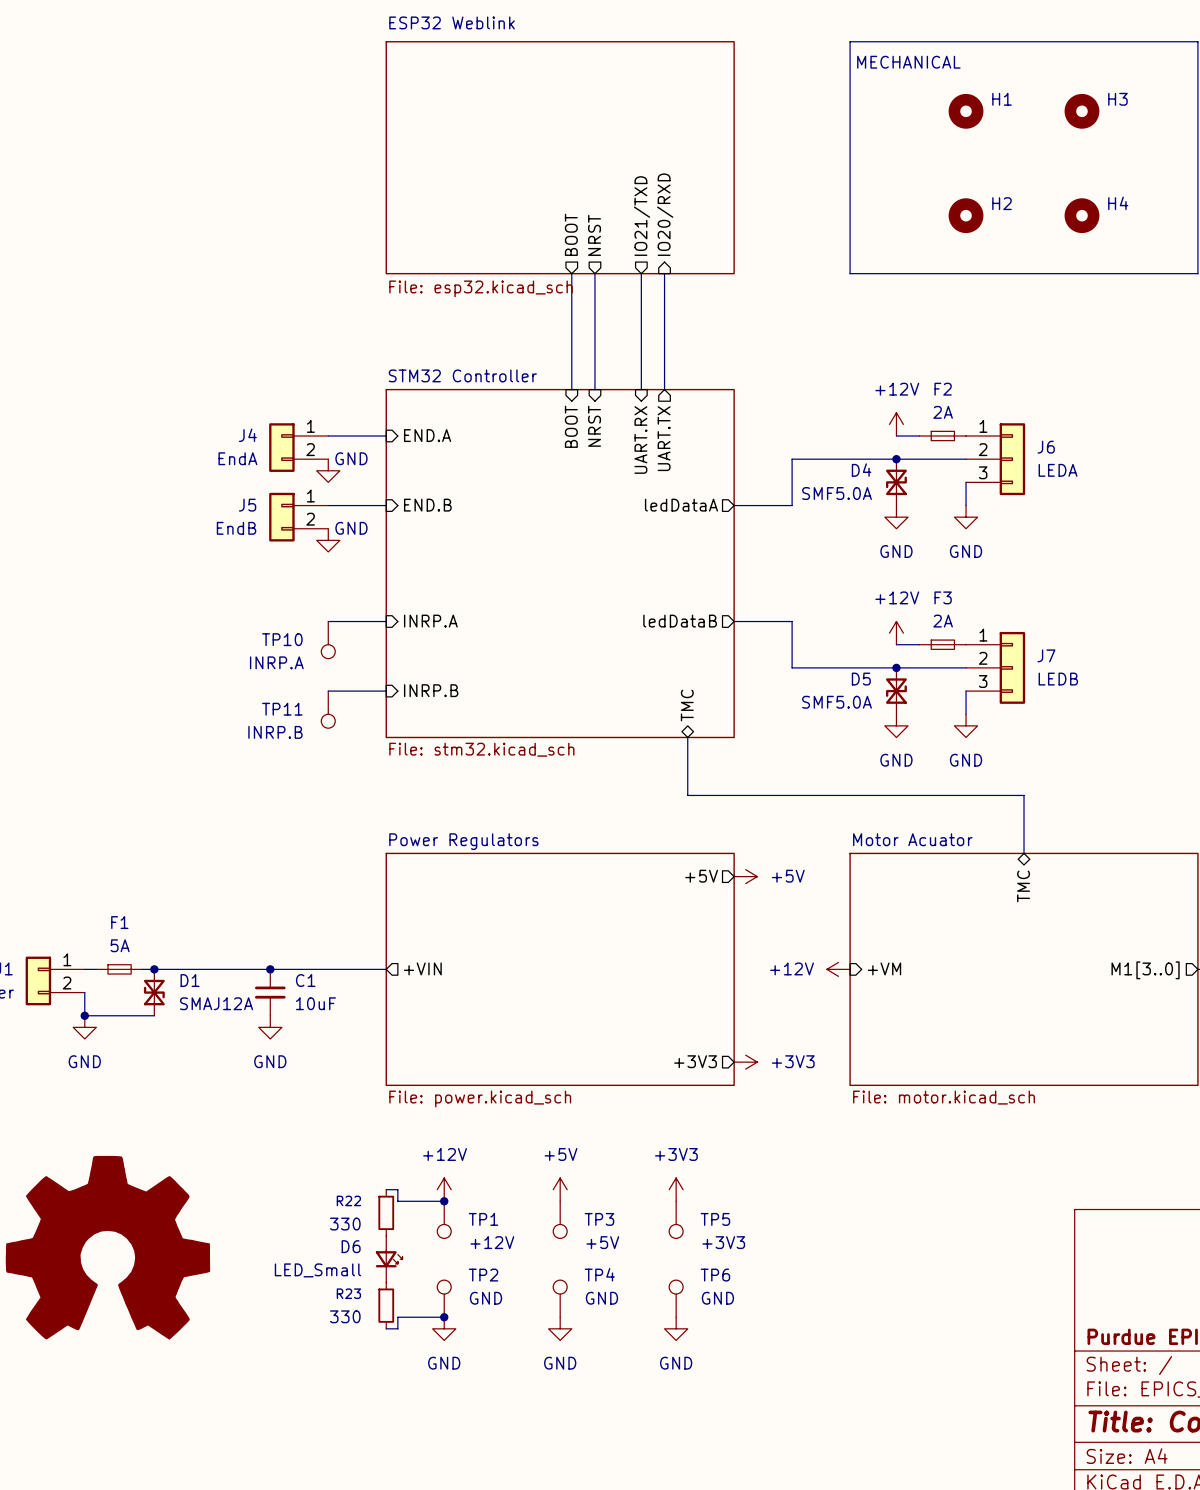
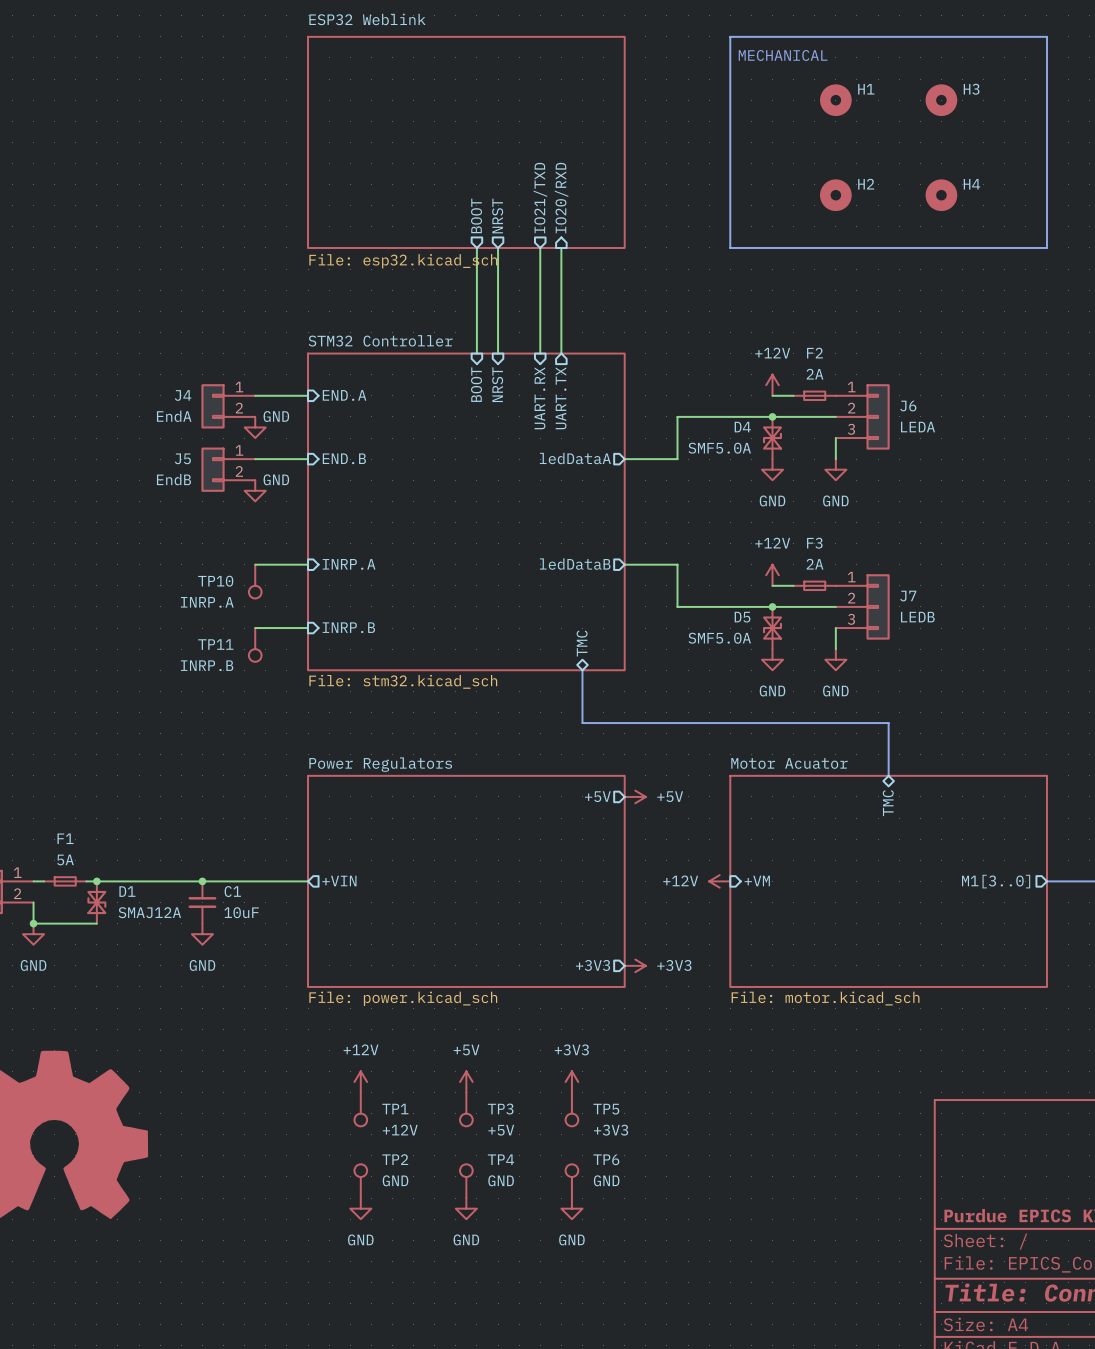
wire: (386, 1189) (397, 1189) (397, 1201) (444, 1201) -> none
junction: (444, 1201) -> none
R22: 330 (386, 1212) -> none
D6: LED_Small (389, 1259) -> none
R23: 330 (386, 1305) -> none
wire: (444, 1317) (397, 1317) (397, 1328) (386, 1328) -> none
junction: (444, 1317) -> none

